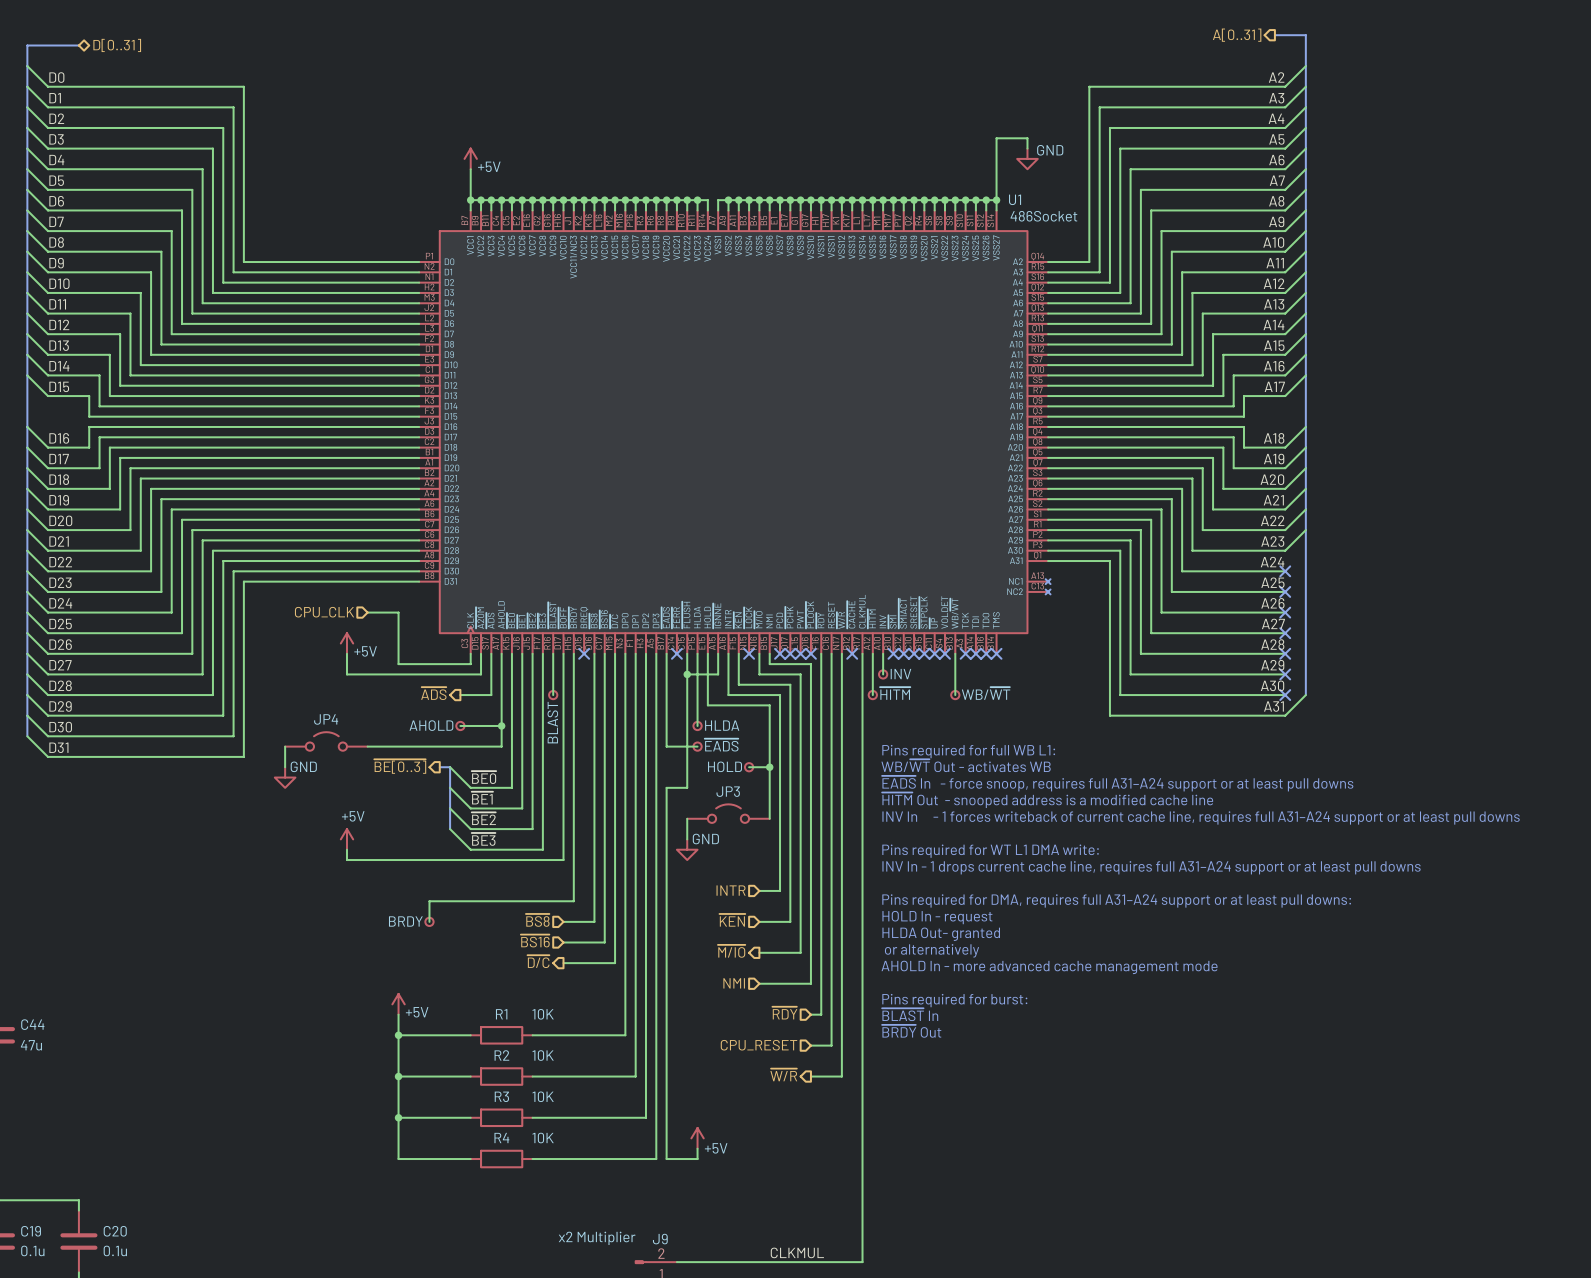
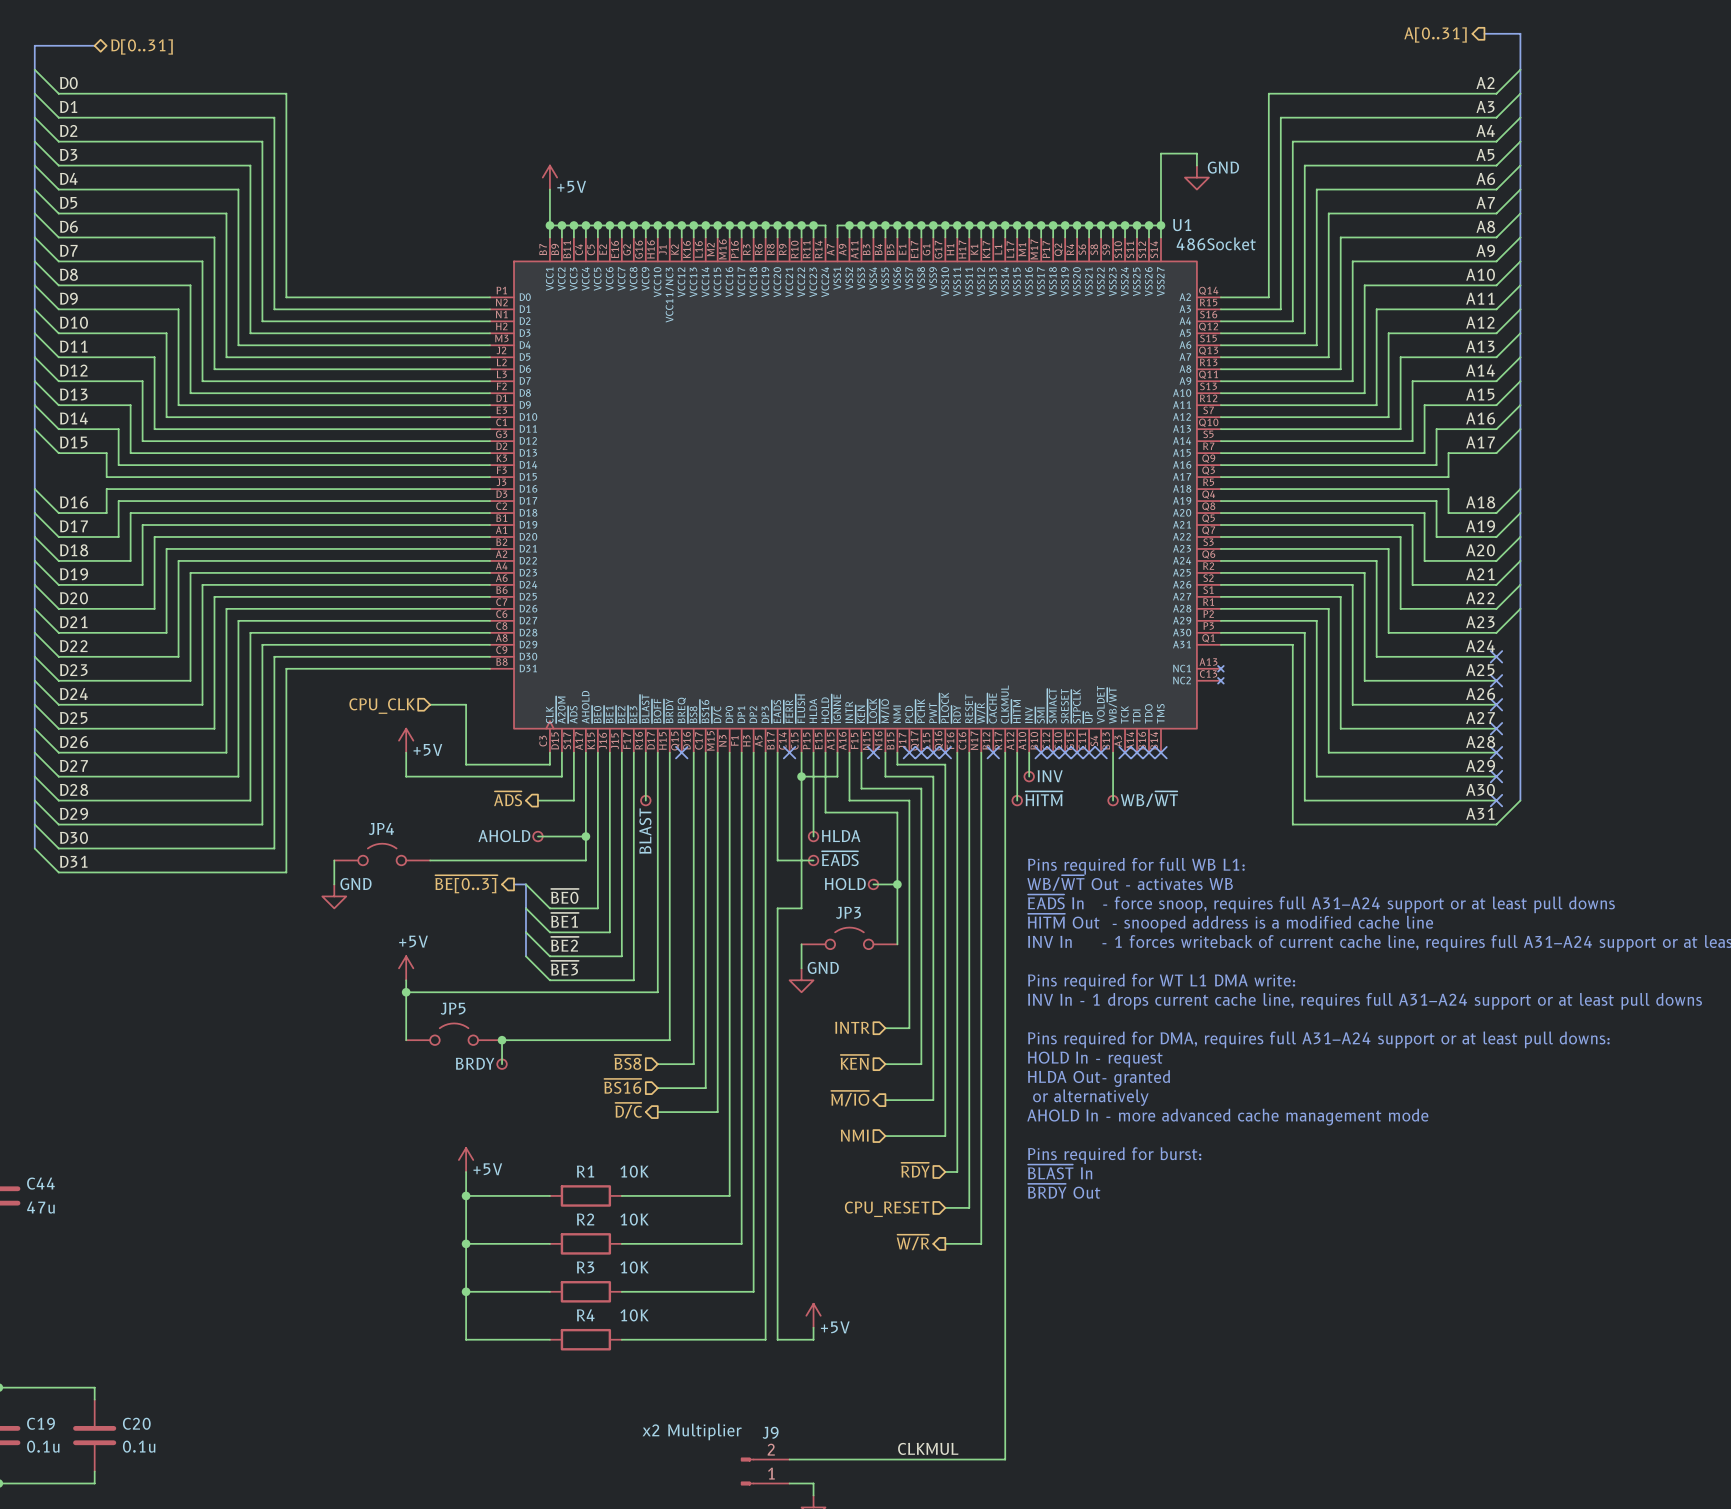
wire: none -> (406, 992) (406, 1040)
junction: none -> (406, 992)
JP5: none -> (454, 1034)
junction: none -> (502, 1040)

